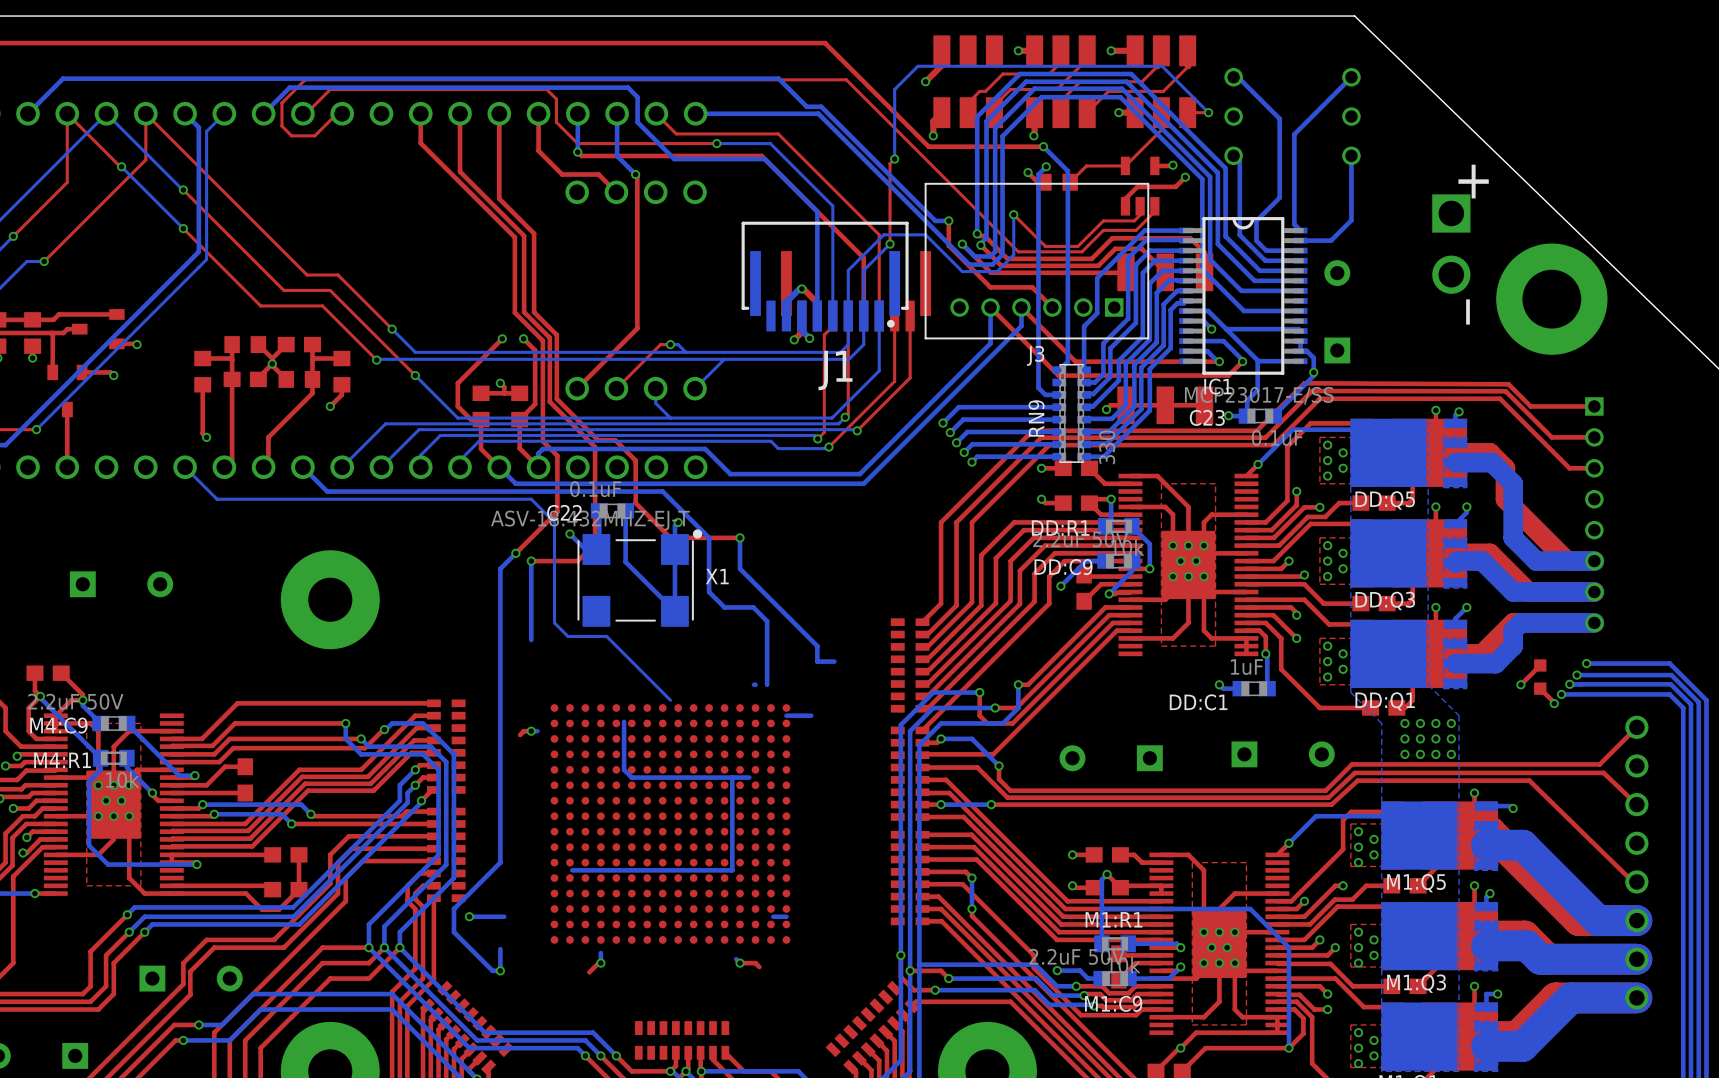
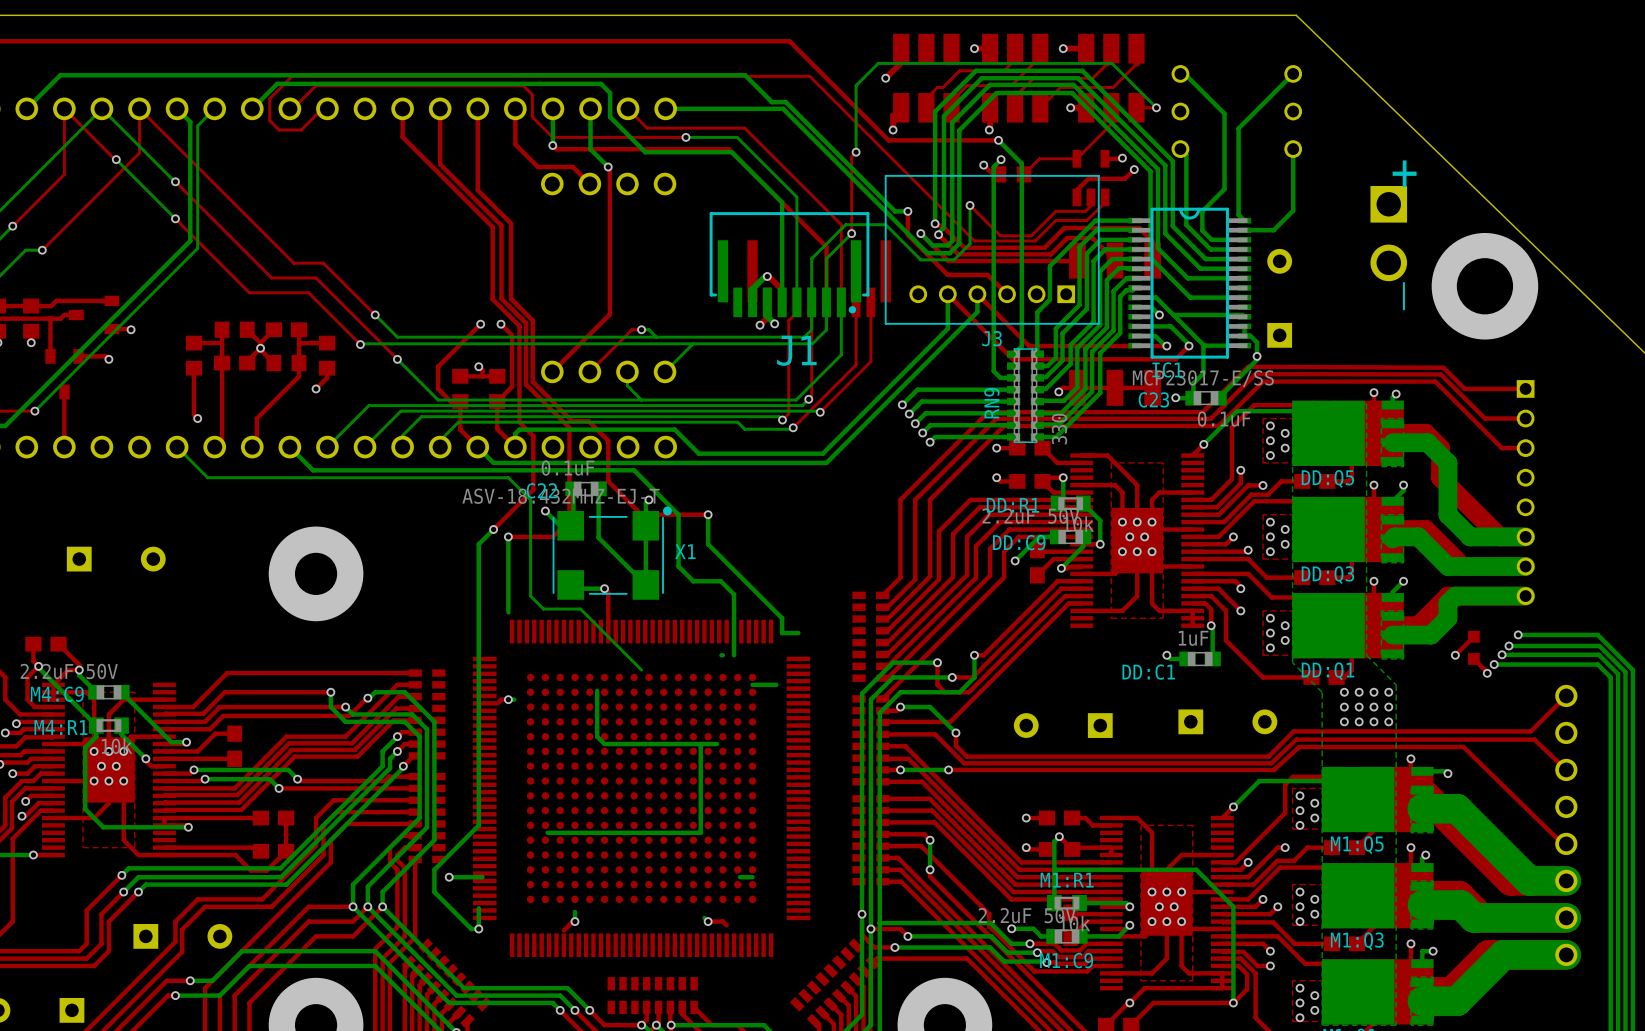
bottom track: none -> (570, 584) (574, 588) (604, 588)
top track: none -> (604, 588) (608, 592) (608, 631)
via: none -> (604, 588)
part: none -> (641, 788)

